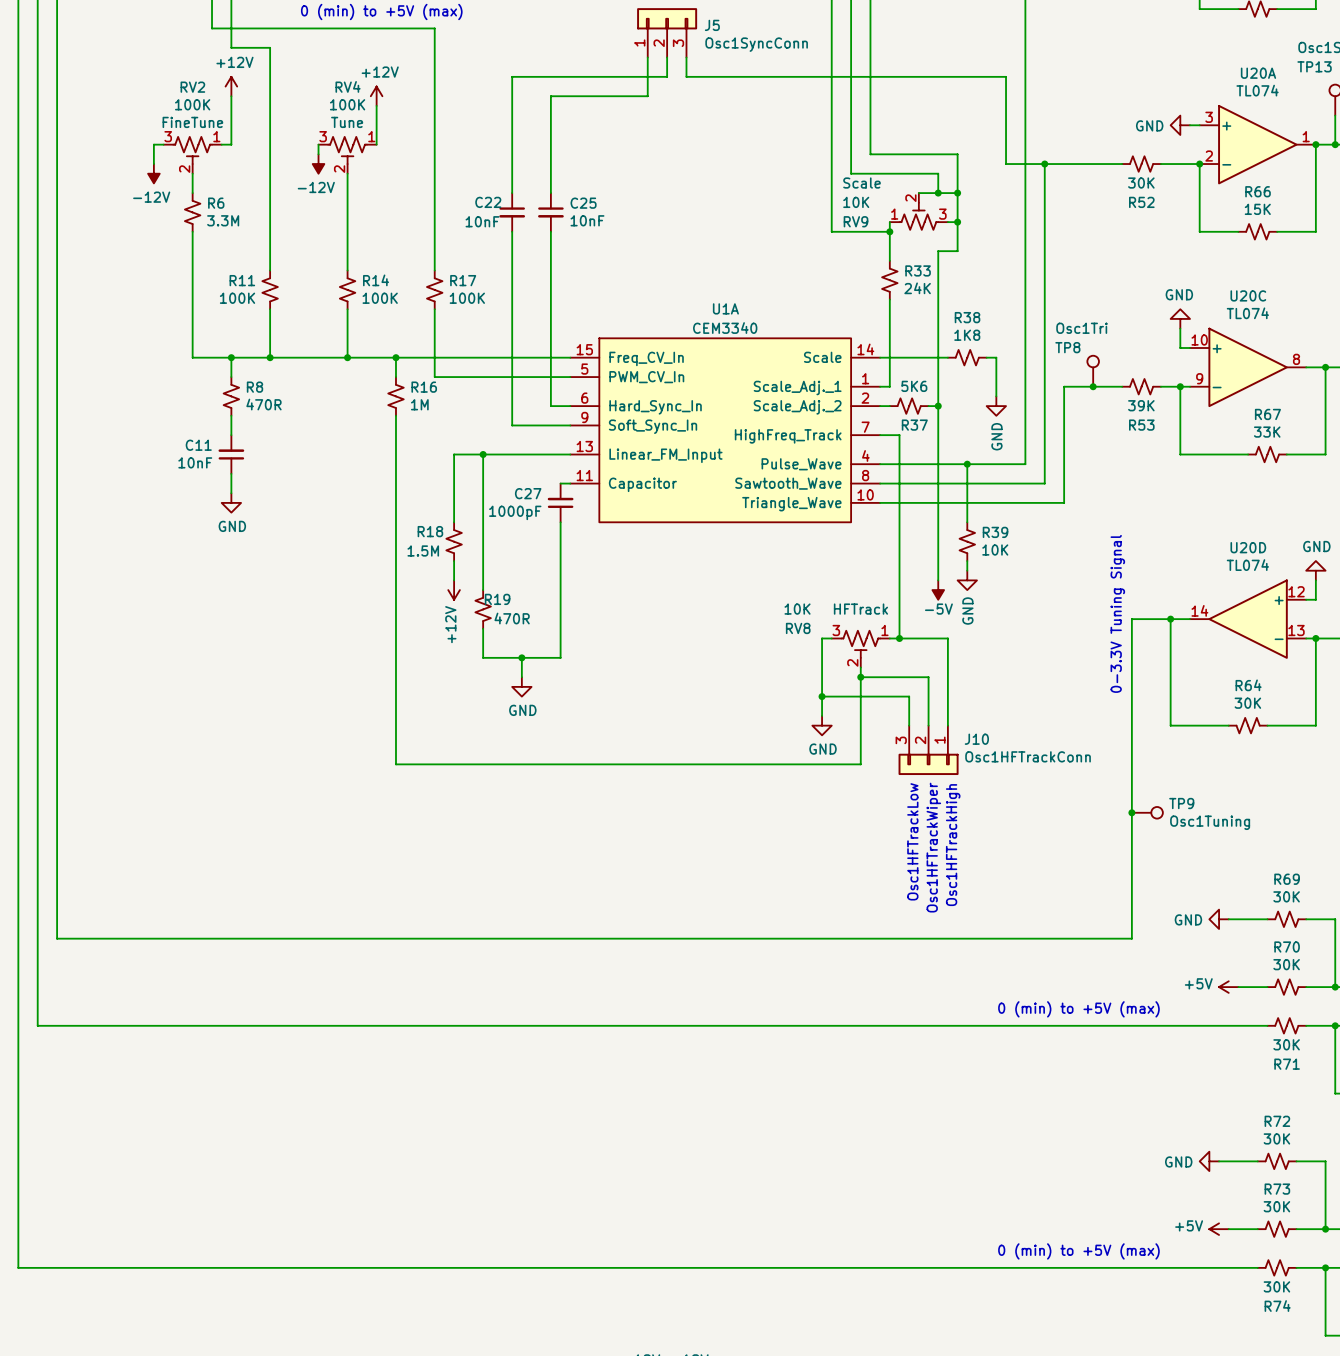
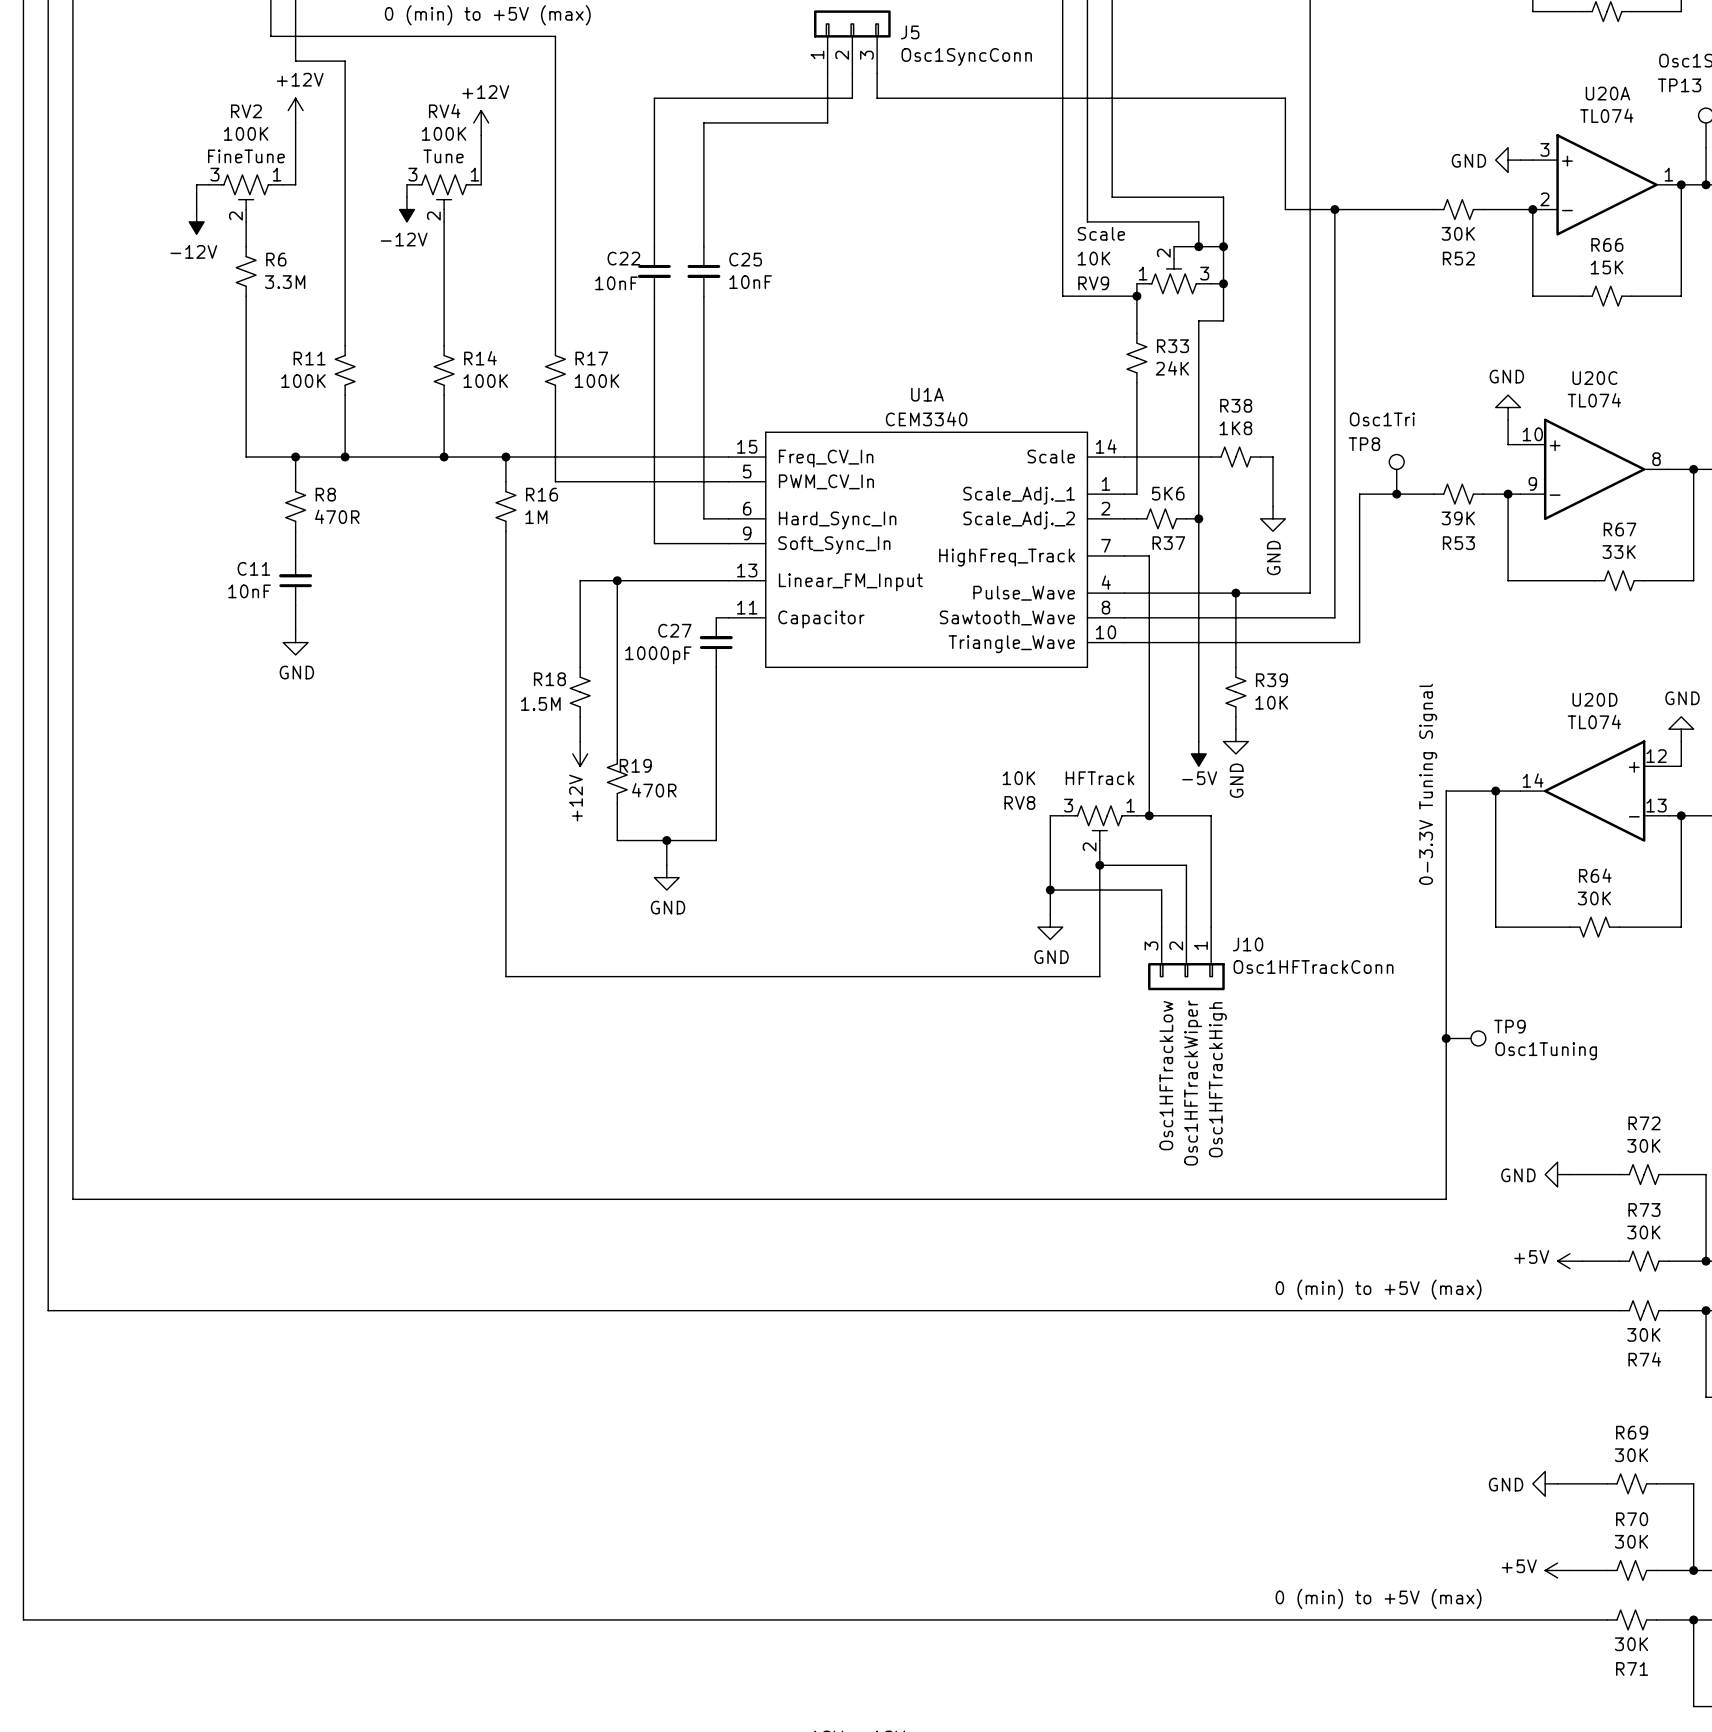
R69 name: R69 (1287, 879) -> R72 (1644, 1123)
R70 name: R70 (1287, 947) -> R73 (1644, 1209)
R71 name: R71 (1287, 1064) -> R74 (1644, 1359)
R72 name: R72 (1277, 1121) -> R69 (1632, 1432)
R73 name: R73 (1277, 1189) -> R70 (1632, 1519)
R74 name: R74 (1277, 1306) -> R71 (1632, 1668)

